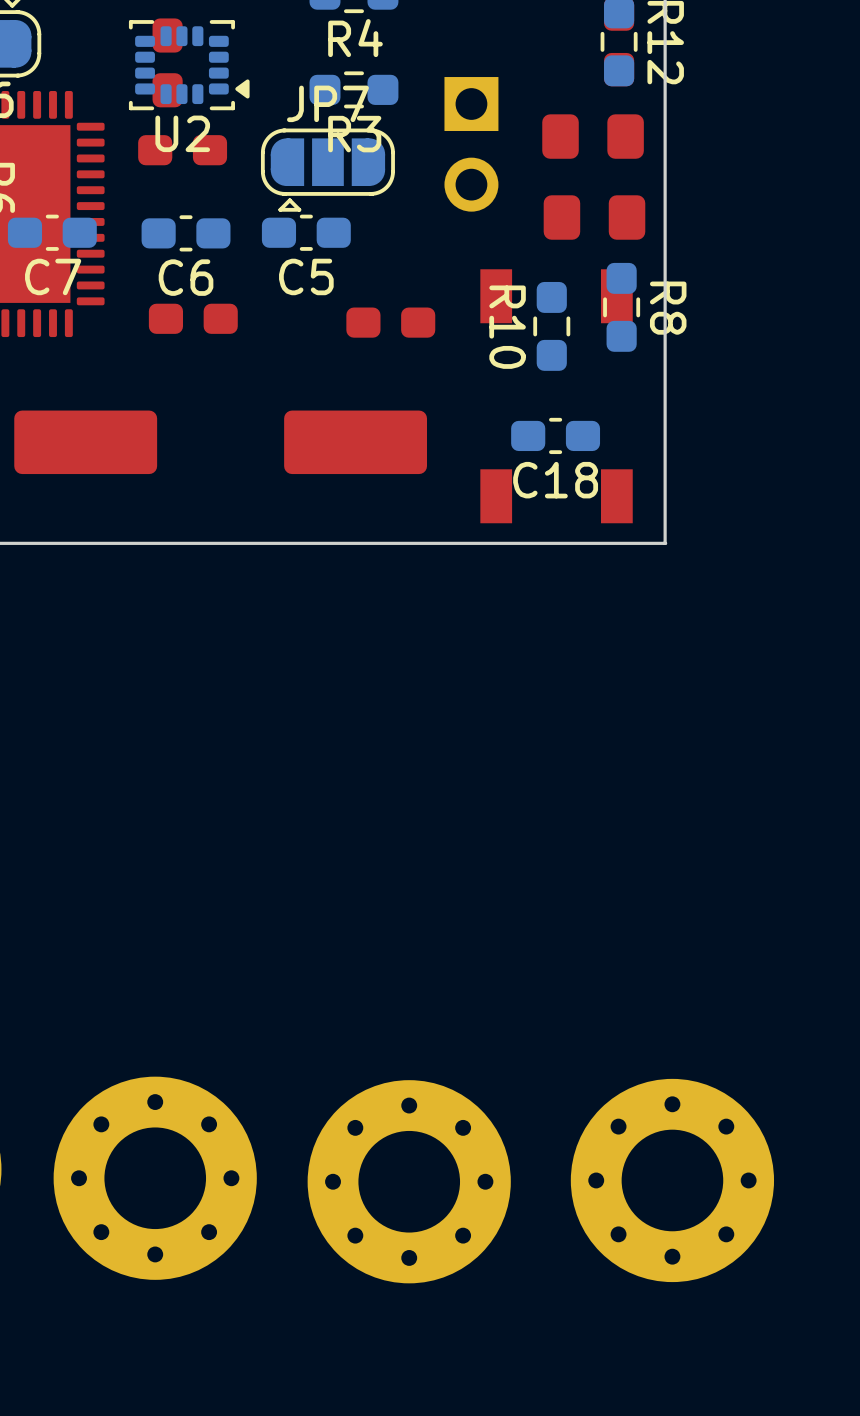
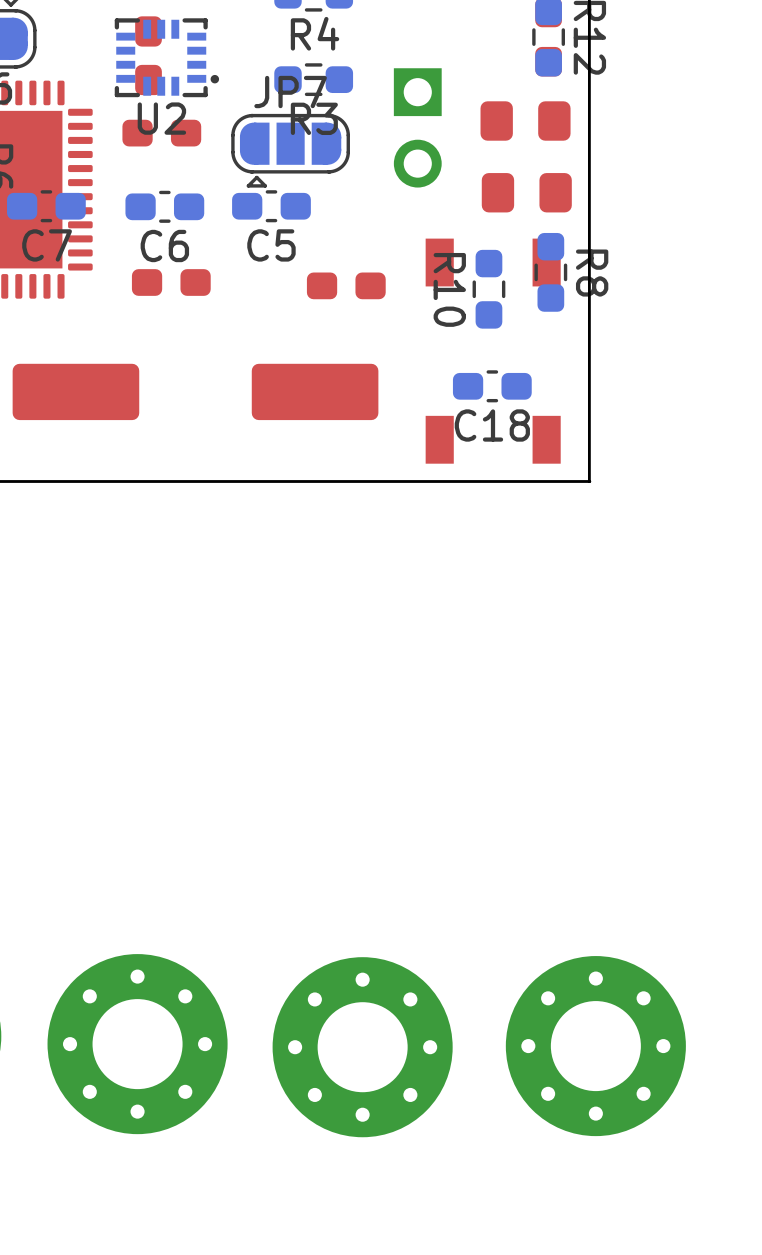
U2 footprint: [128, 20, 250, 111] -> [114, 18, 220, 98]

